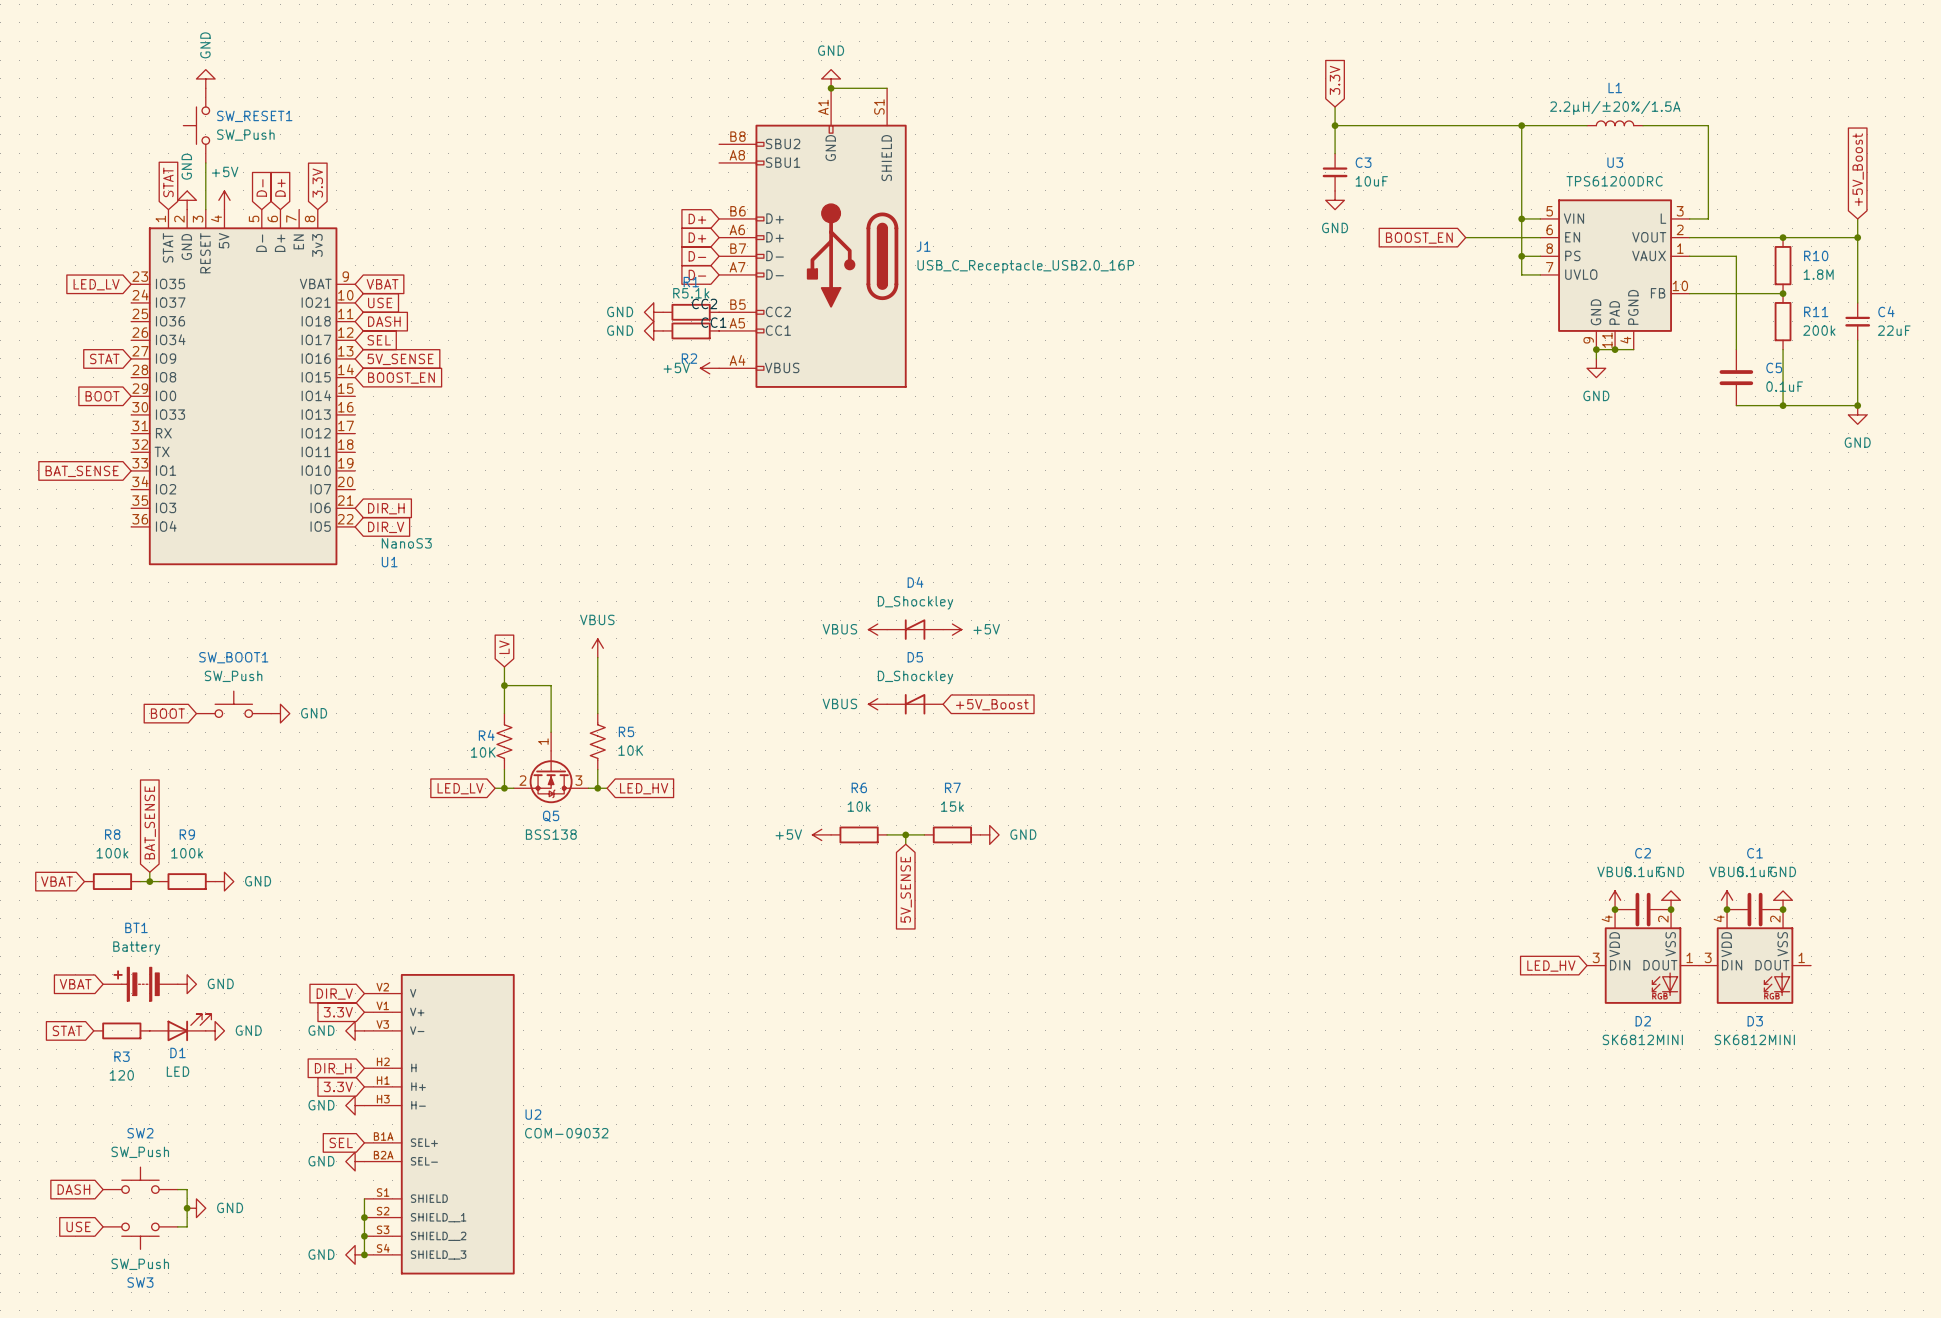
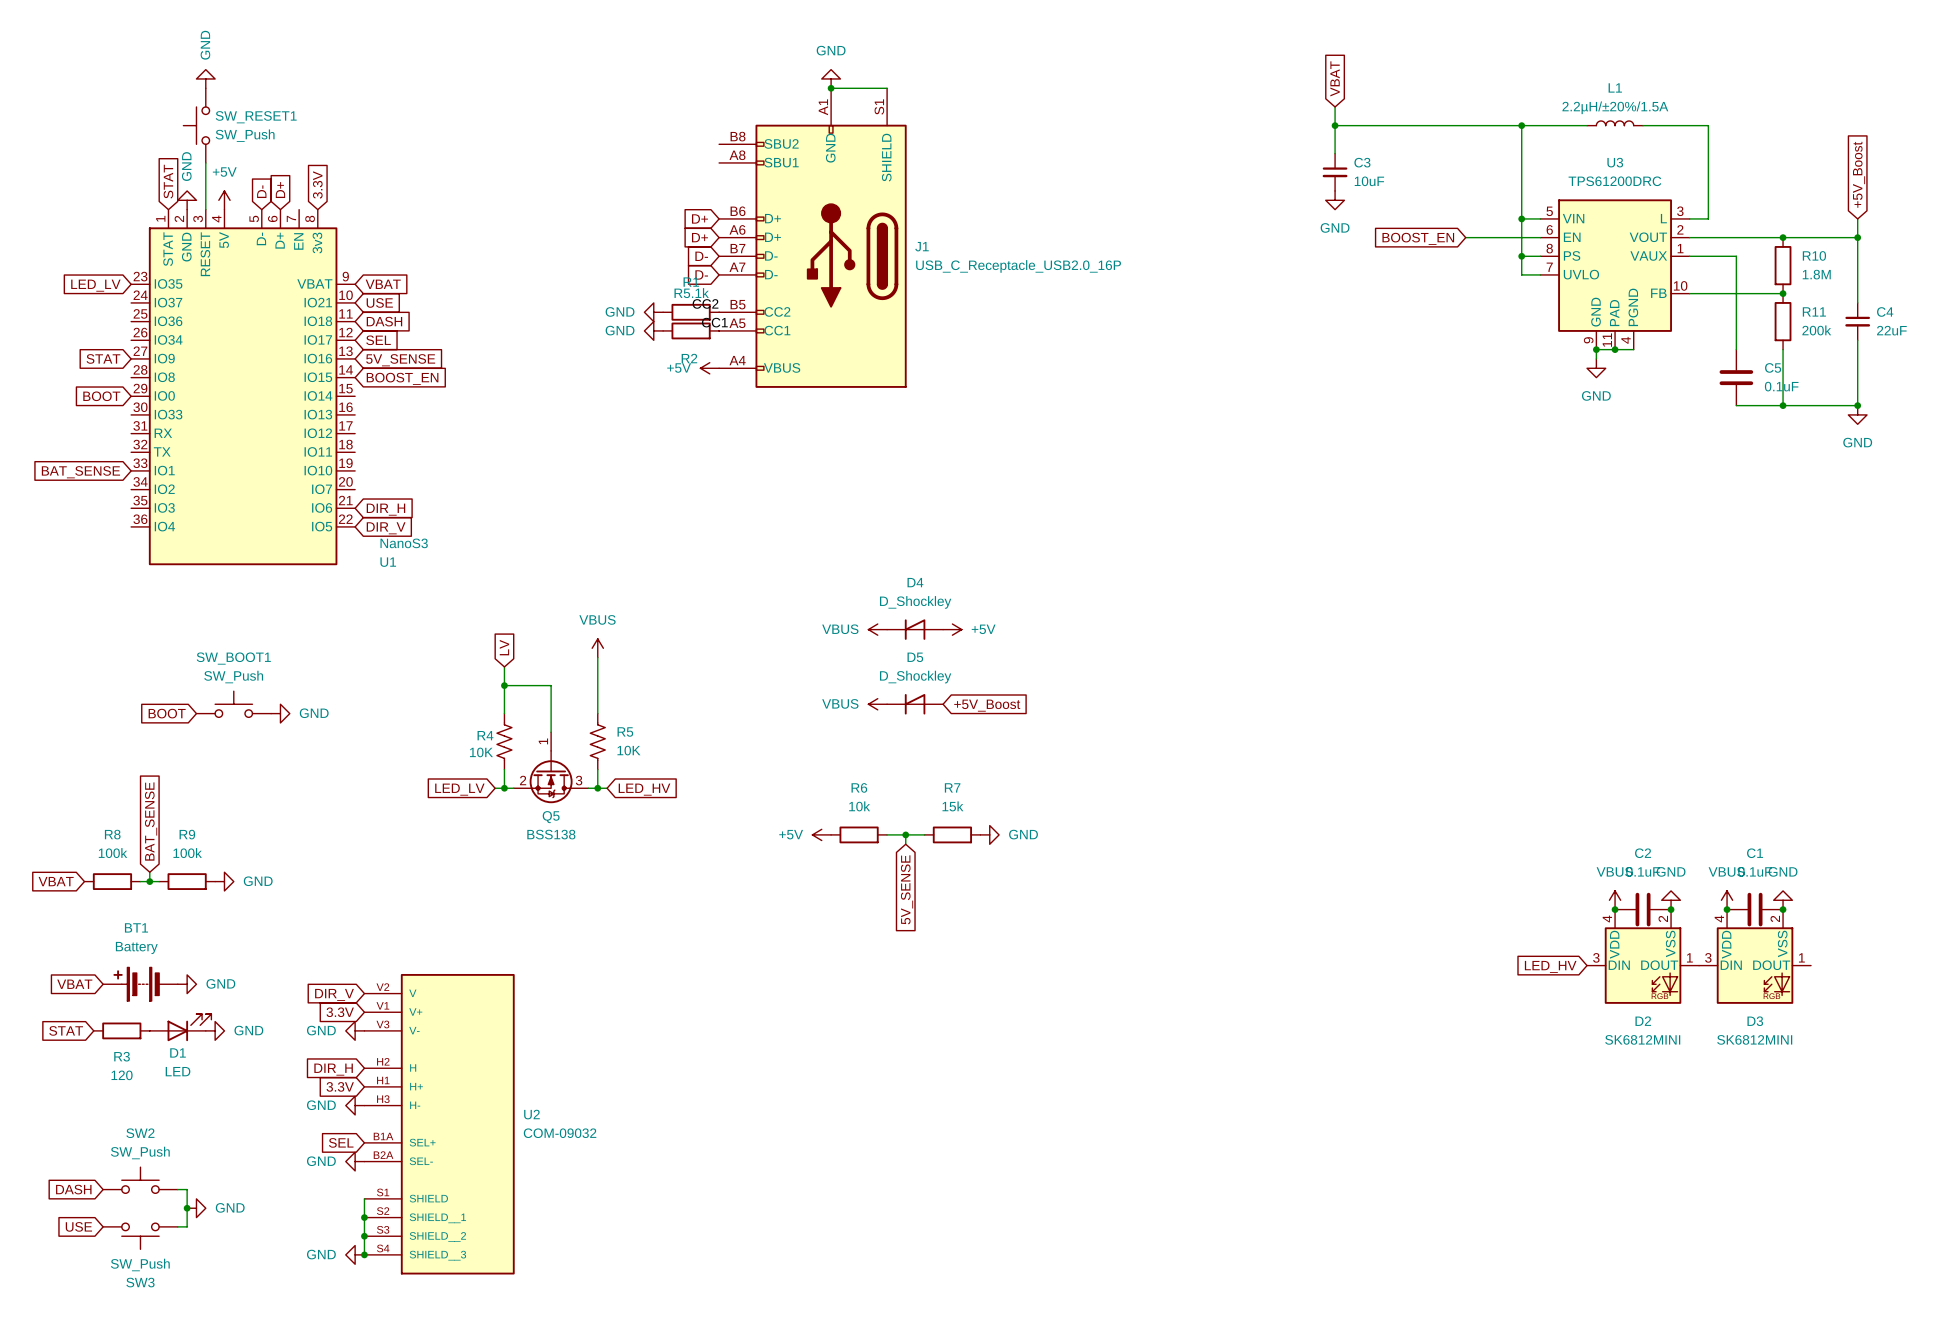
global label: 3.3V (1335, 80) -> VBAT (1335, 78)

